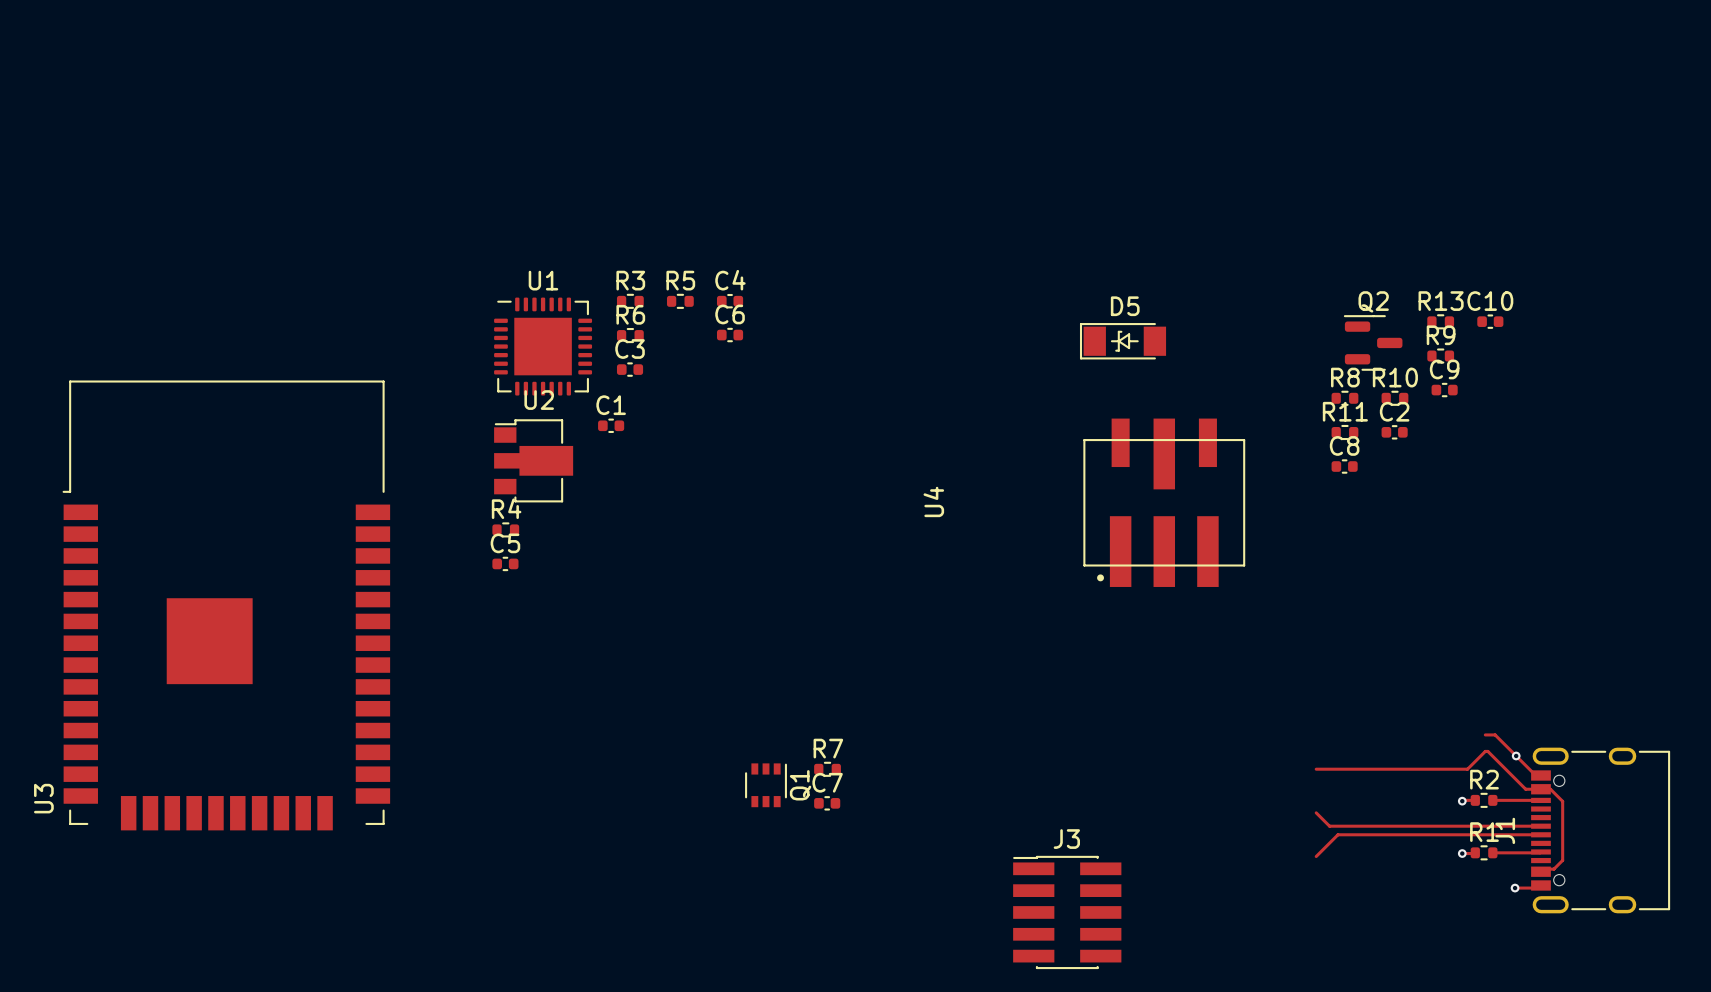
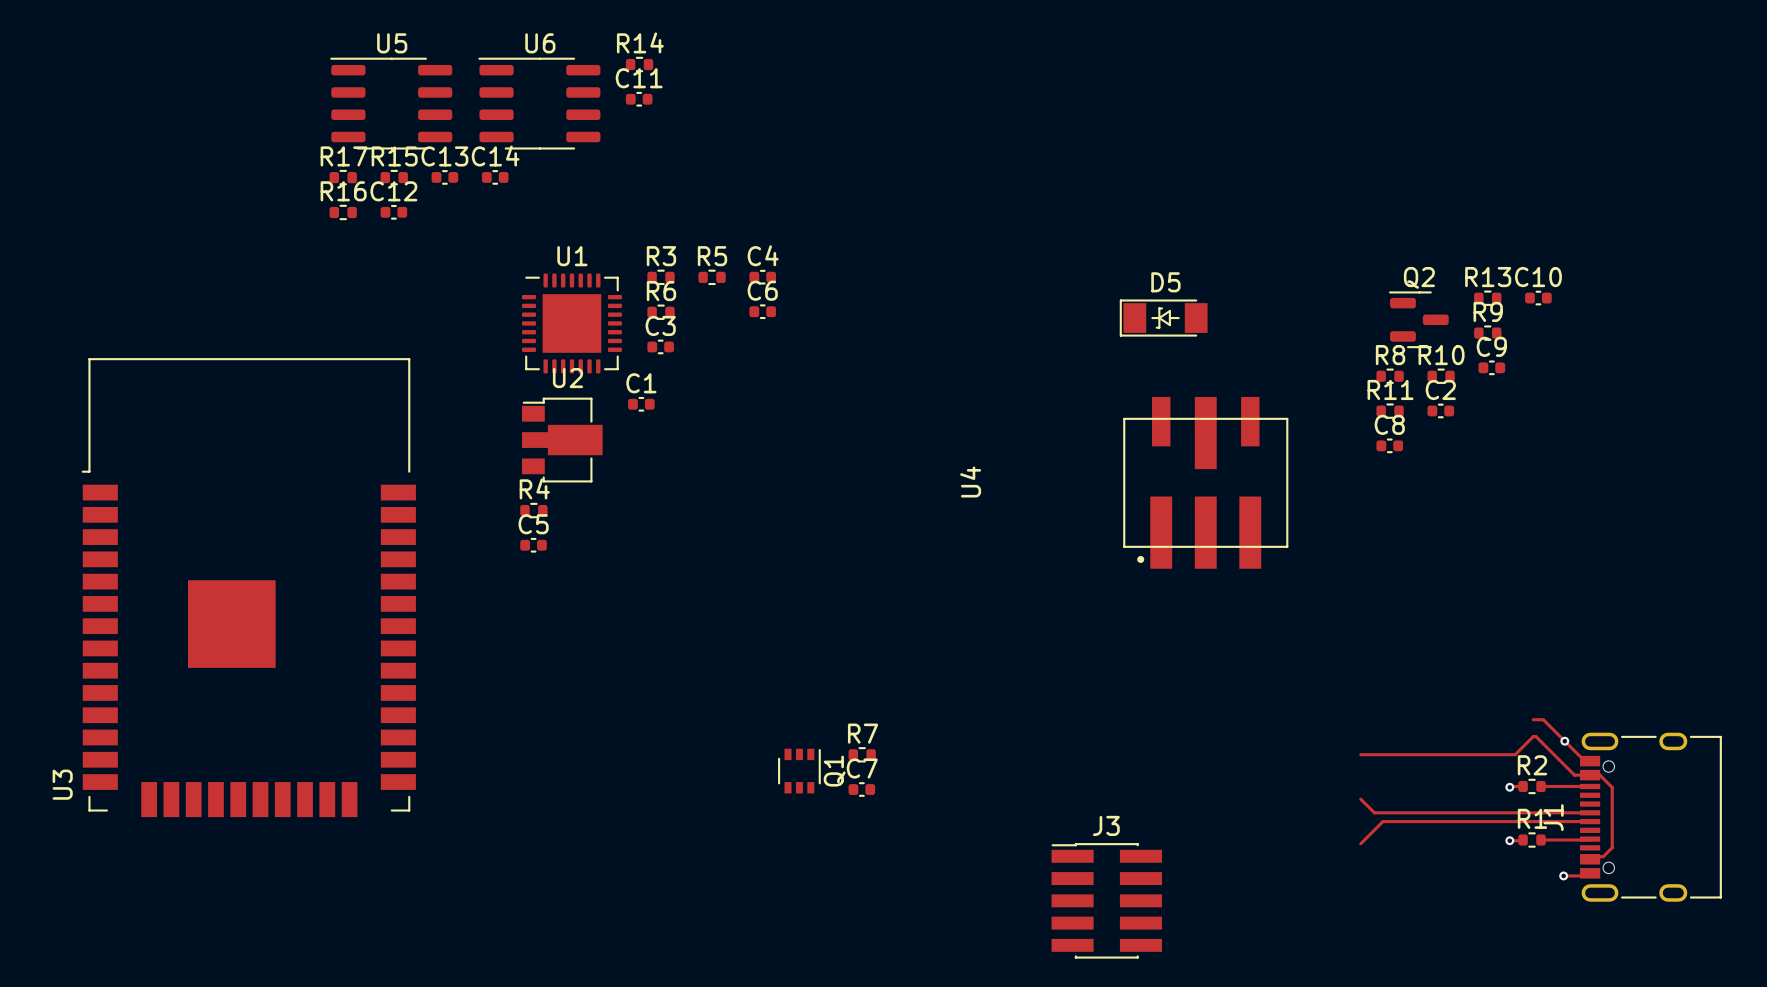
R14: none -> (639, 64)
C11: none -> (639, 99)
U5: none -> (391, 103)
U6: none -> (539, 103)
R17: none -> (343, 177)
R15: none -> (394, 177)
C13: none -> (444, 177)
C14: none -> (495, 177)
R16: none -> (343, 212)
C12: none -> (393, 212)

